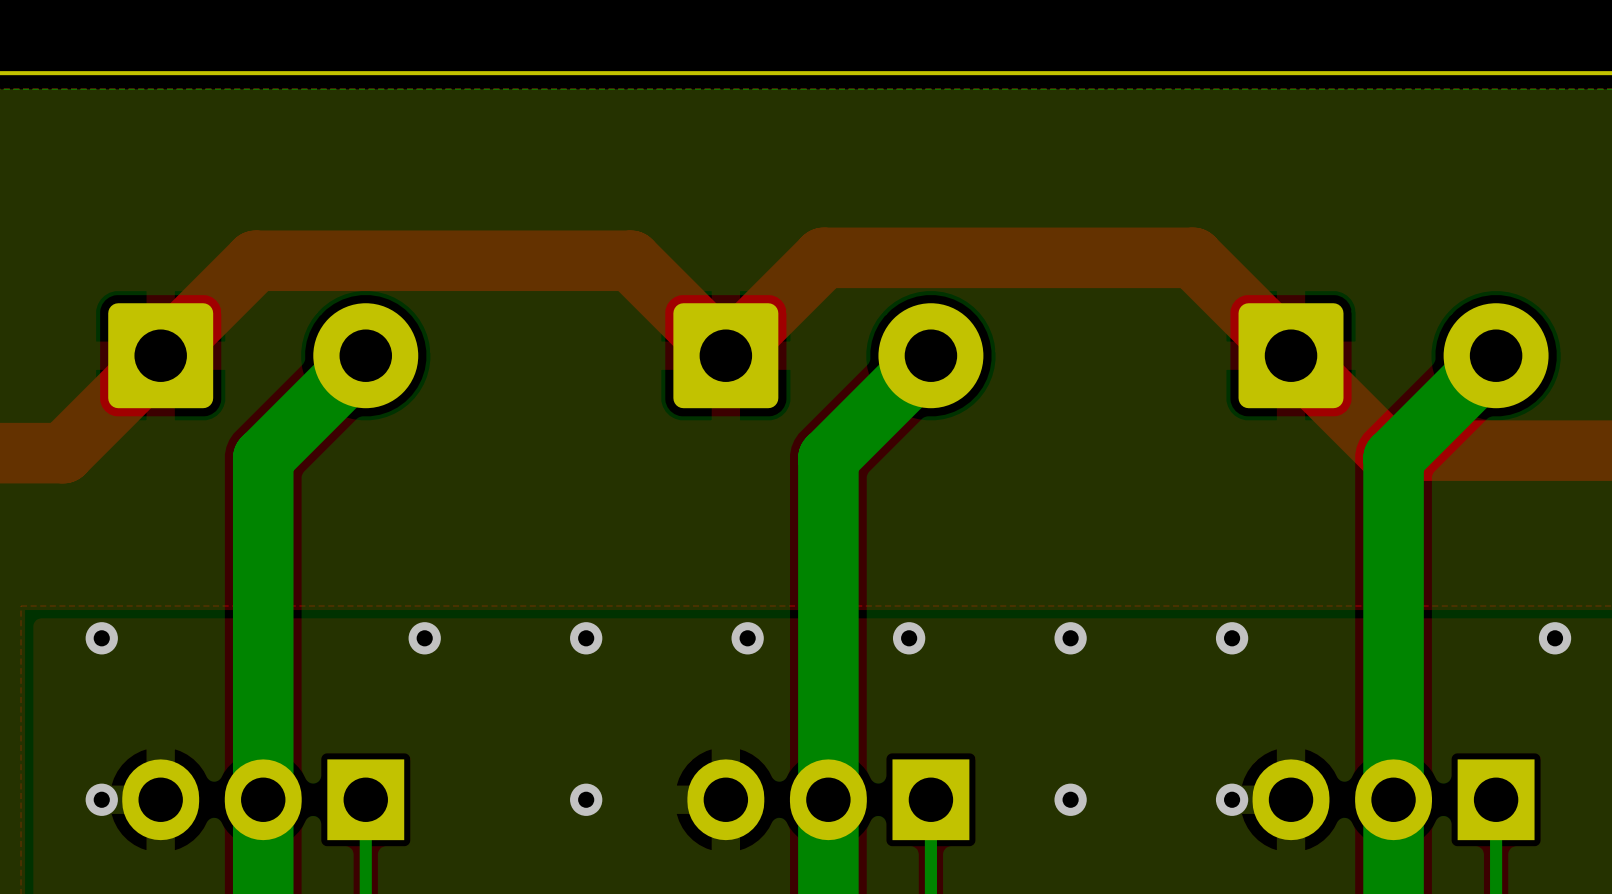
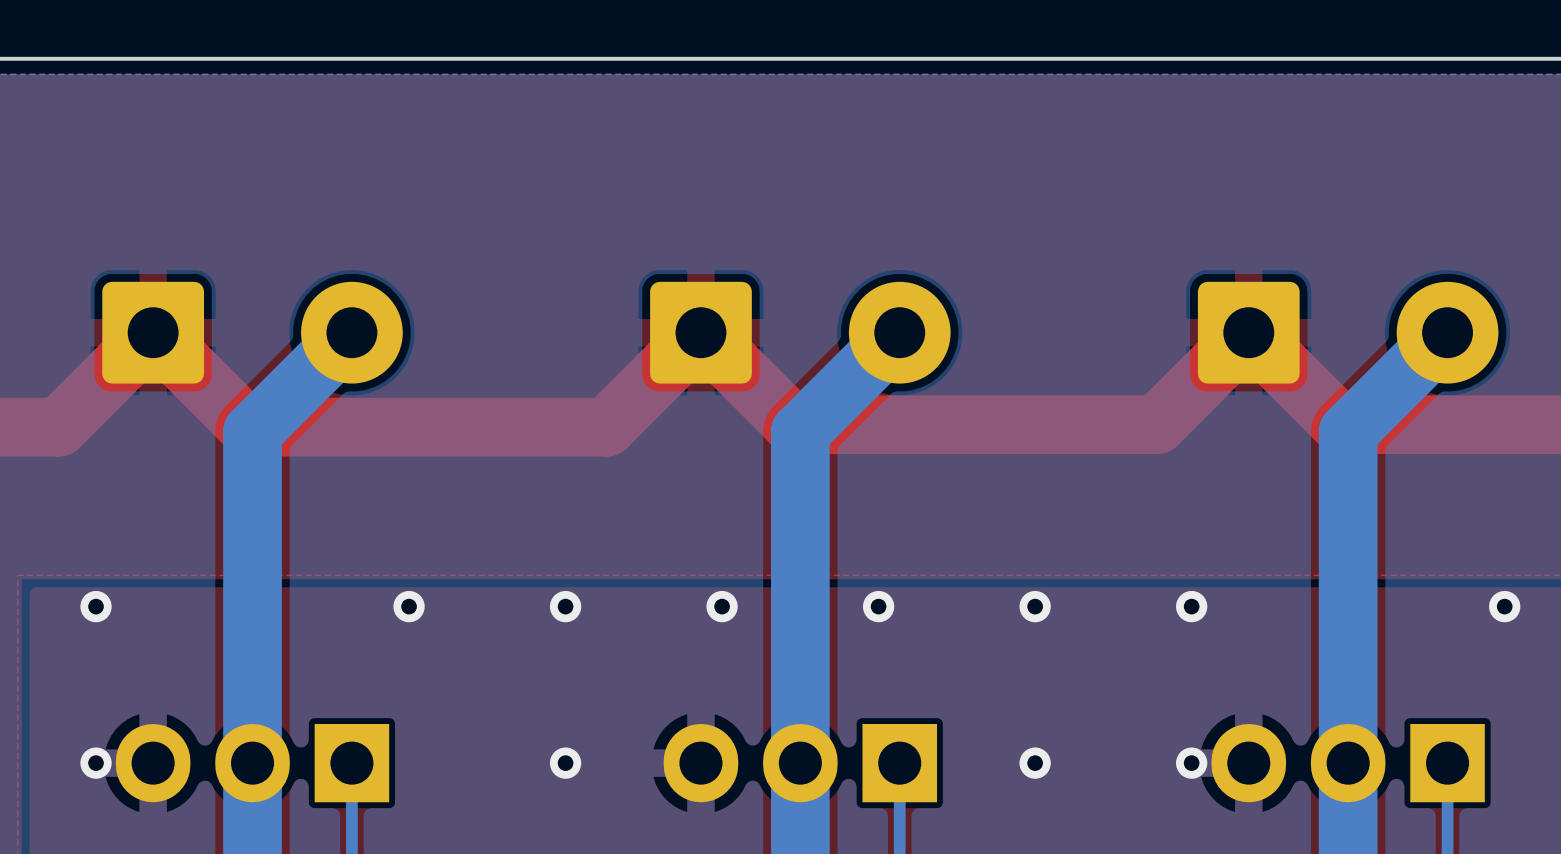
top track: (1291, 355) (1193, 257) (823, 257) (725, 355) (630, 260) (255, 260) (160, 355) -> (1248, 332) (1156, 424) (792, 424) (700, 332) (606, 427) (247, 427) (153, 332)

